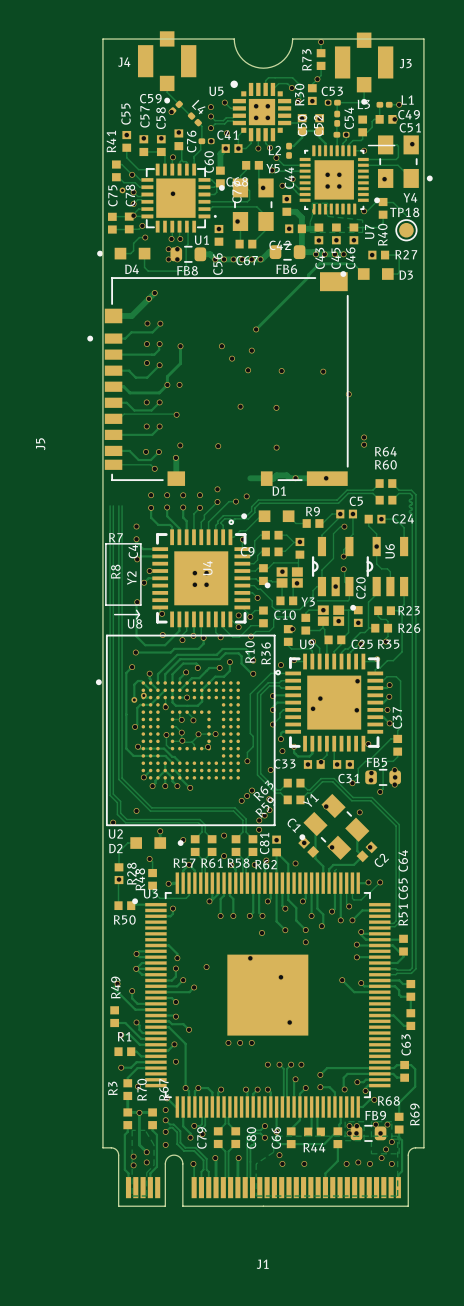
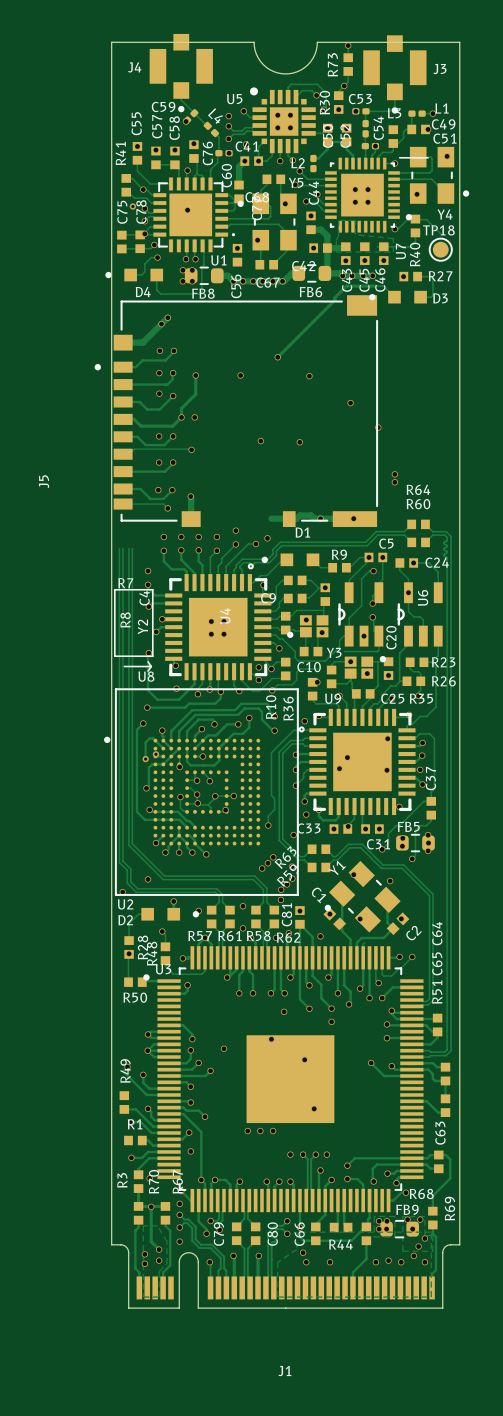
via: none -> (309, 376)
via: (251, 350) -> none
via: (232, 358) -> none
via: (248, 370) -> none
via: (281, 371) -> none
via: (180, 445) -> none
via: (218, 446) -> none
via: (276, 447) -> none

